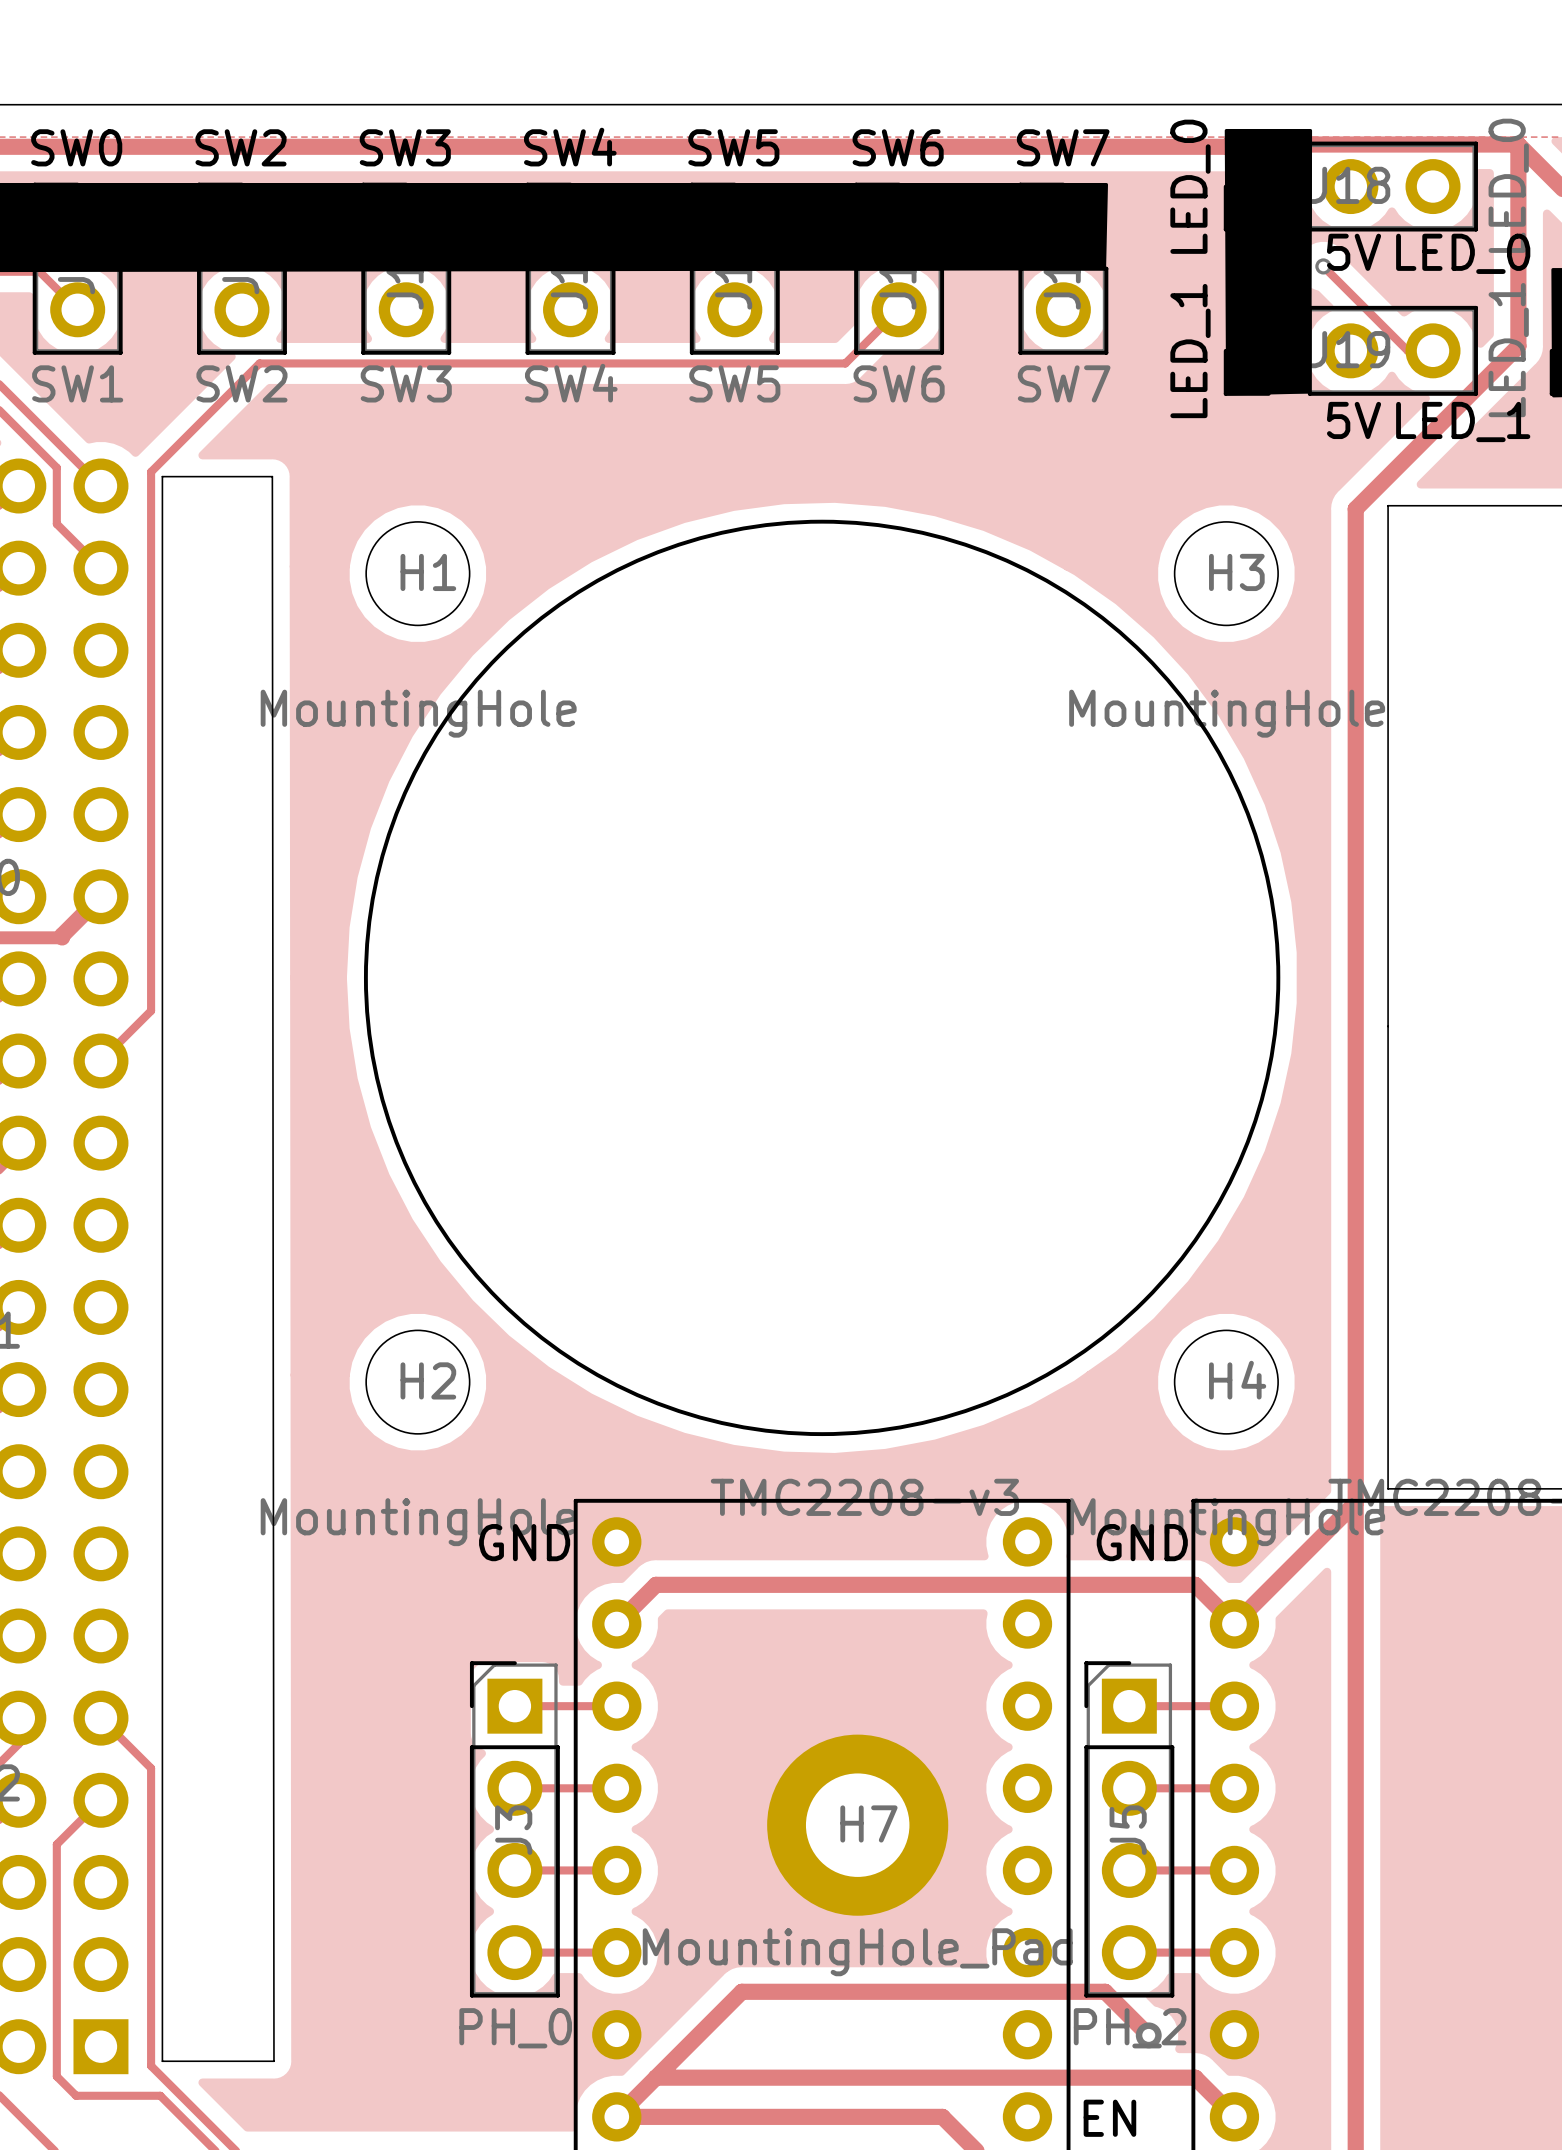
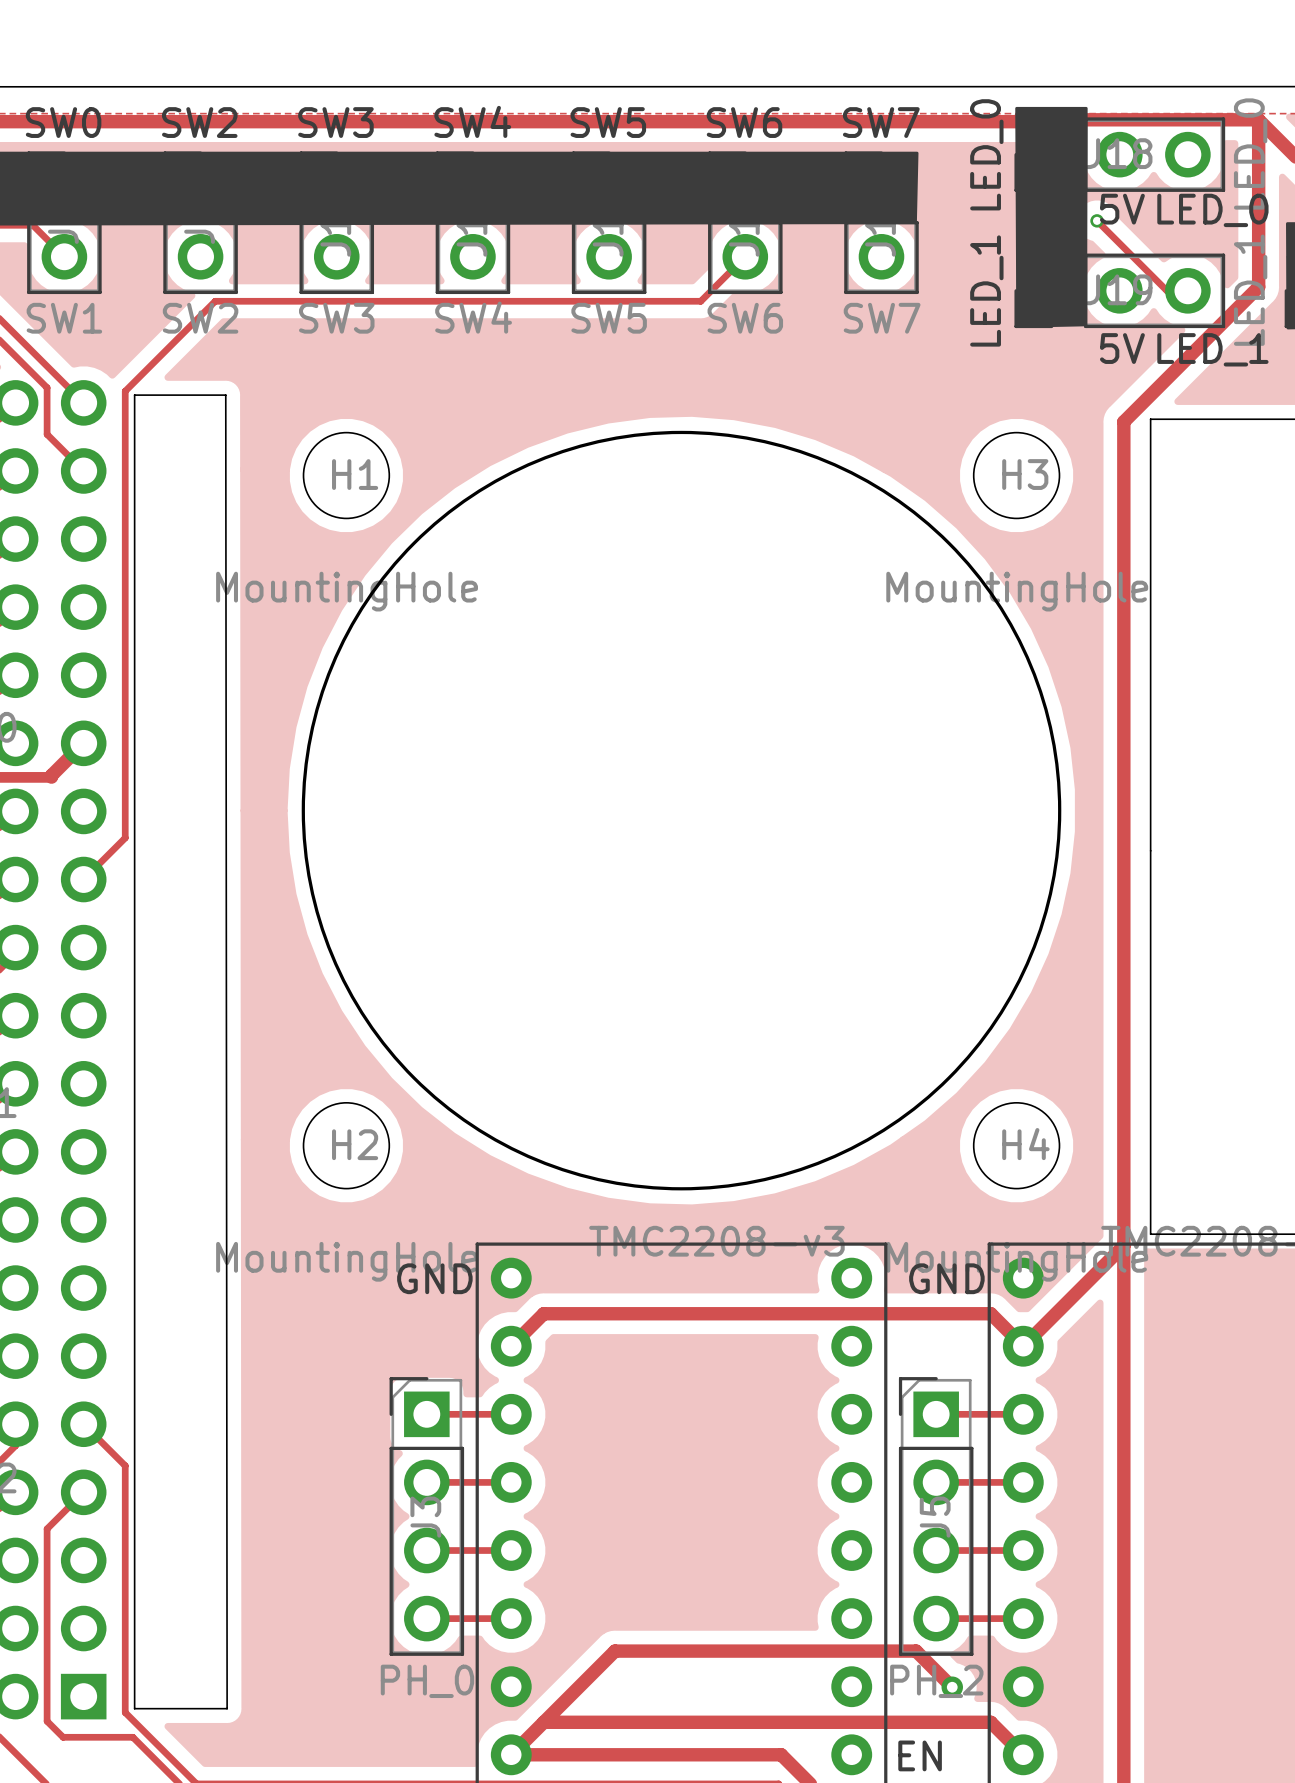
H7: MountingHole_Pad (857, 1825) -> none

